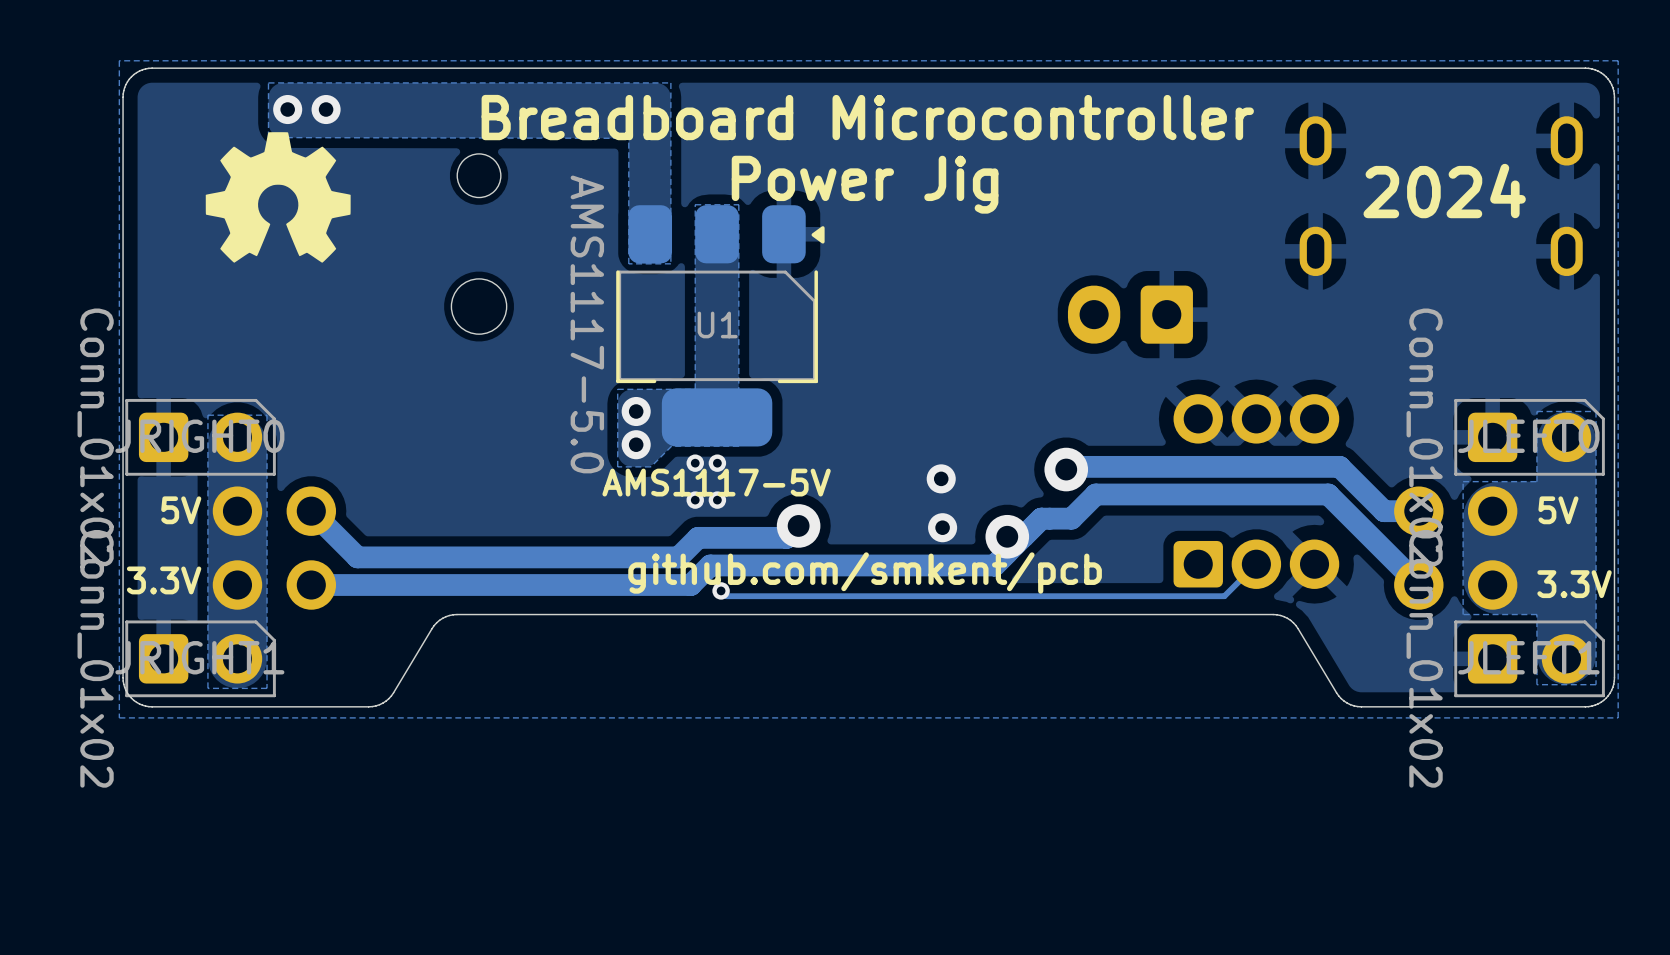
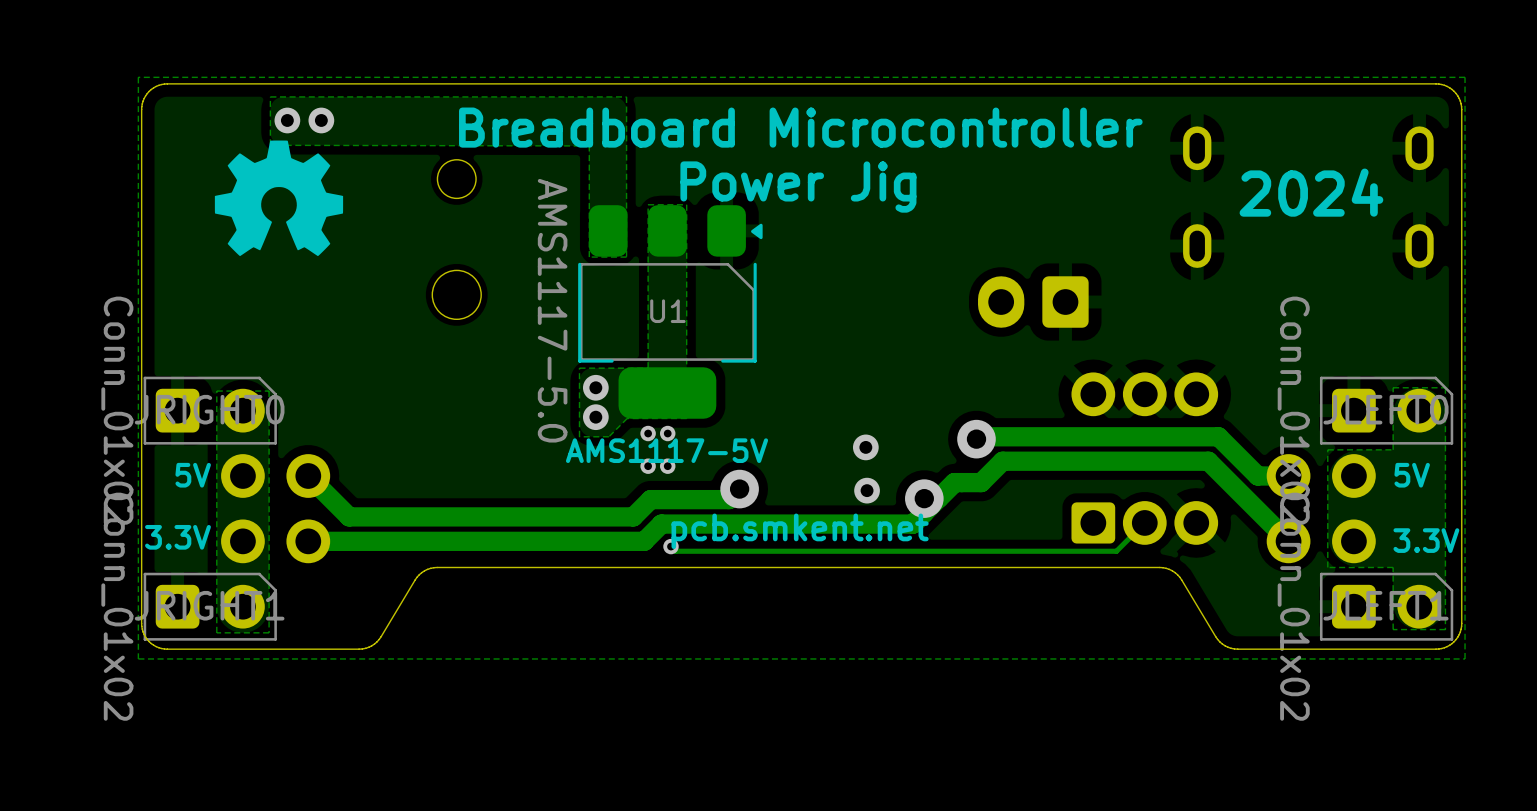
text: github.com/smkent/pcb (865, 573) -> pcb.smkent.net (800, 531)

